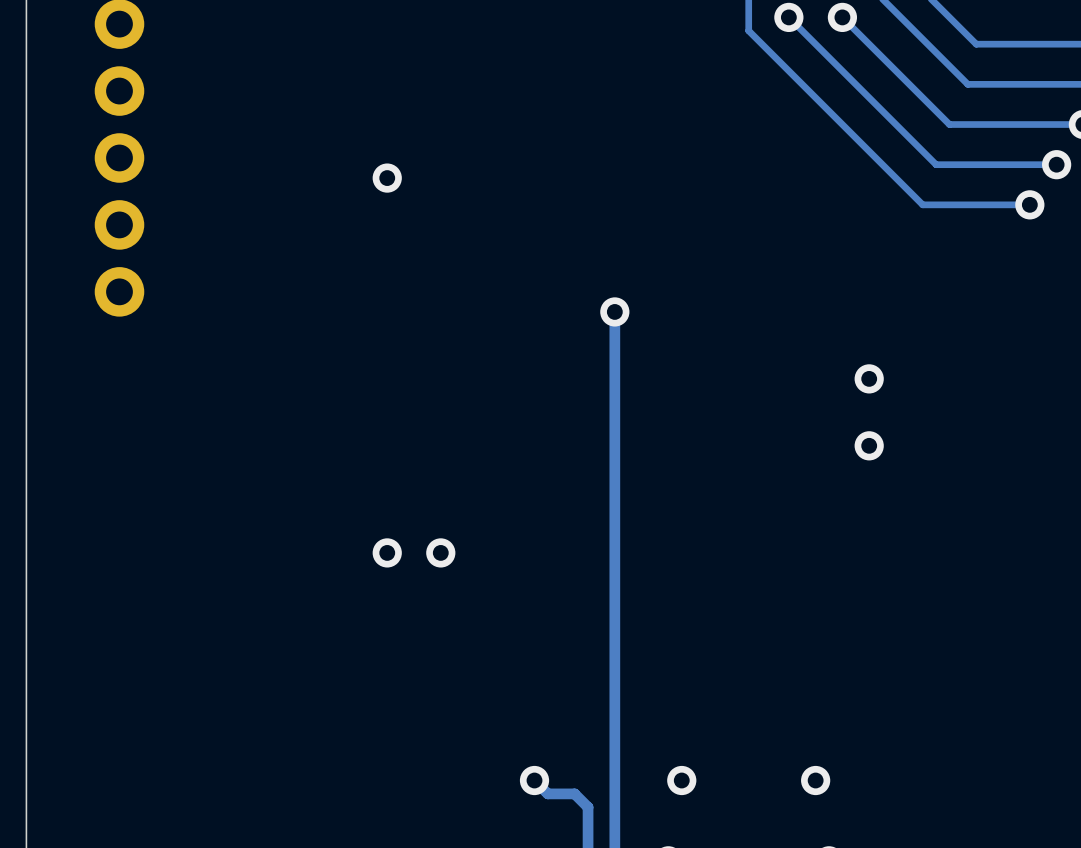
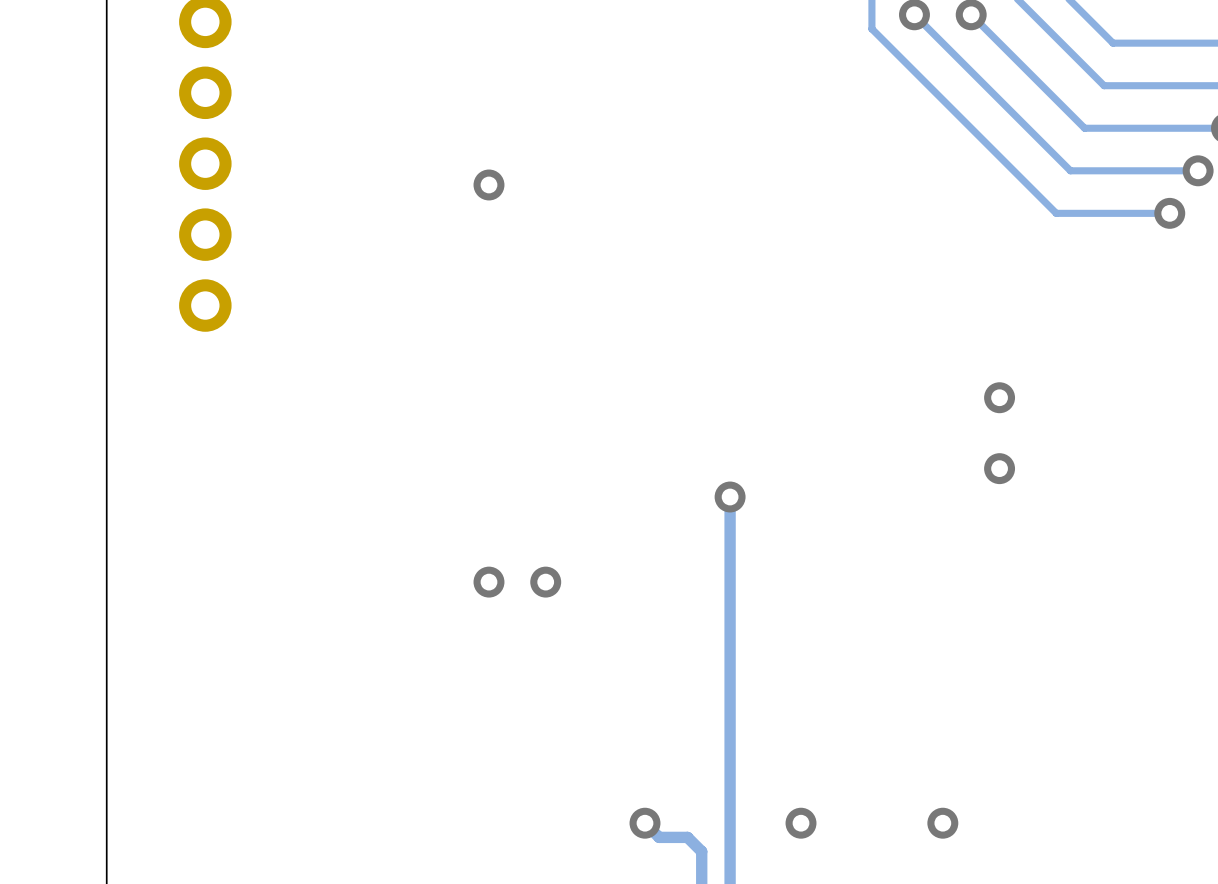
track: (614, 311) (614, 472) -> none
via: (614, 311) -> none
via: none -> (730, 497)

